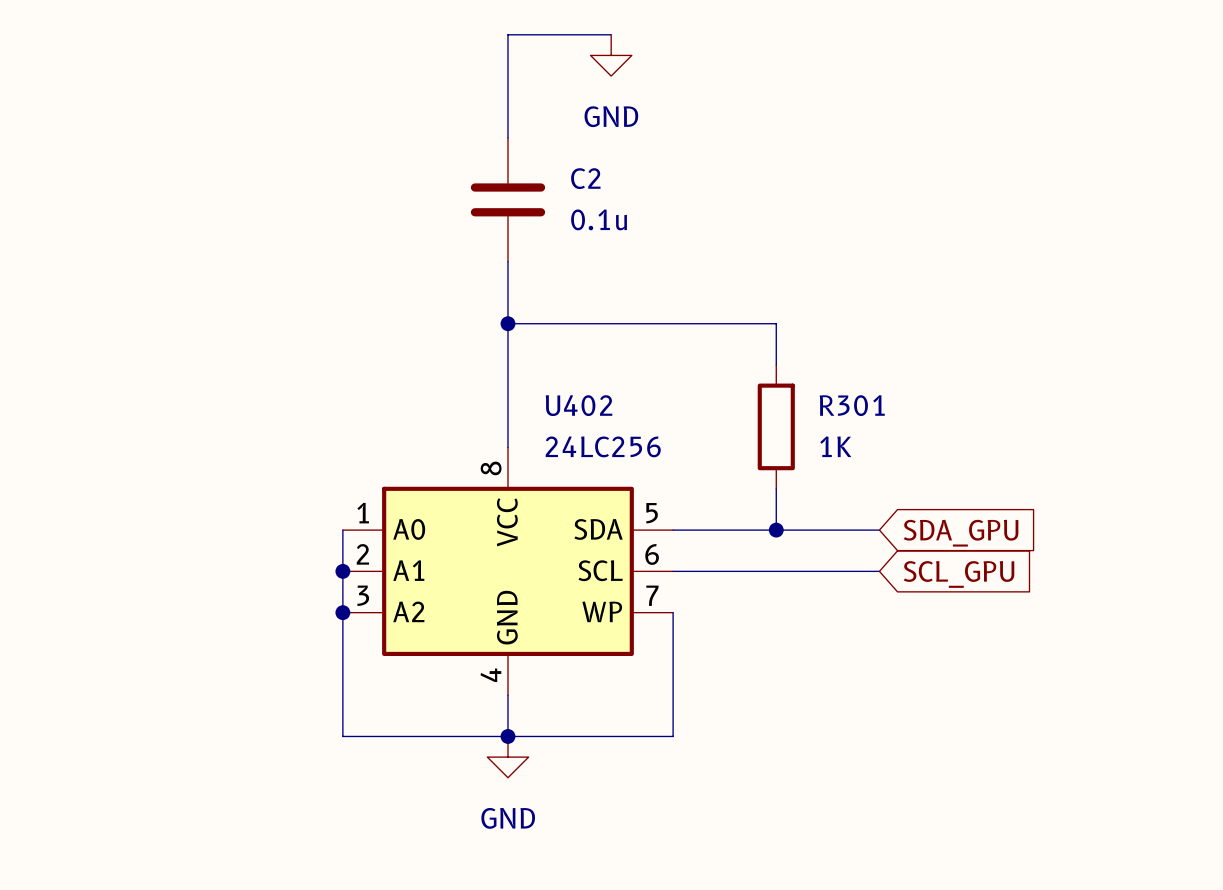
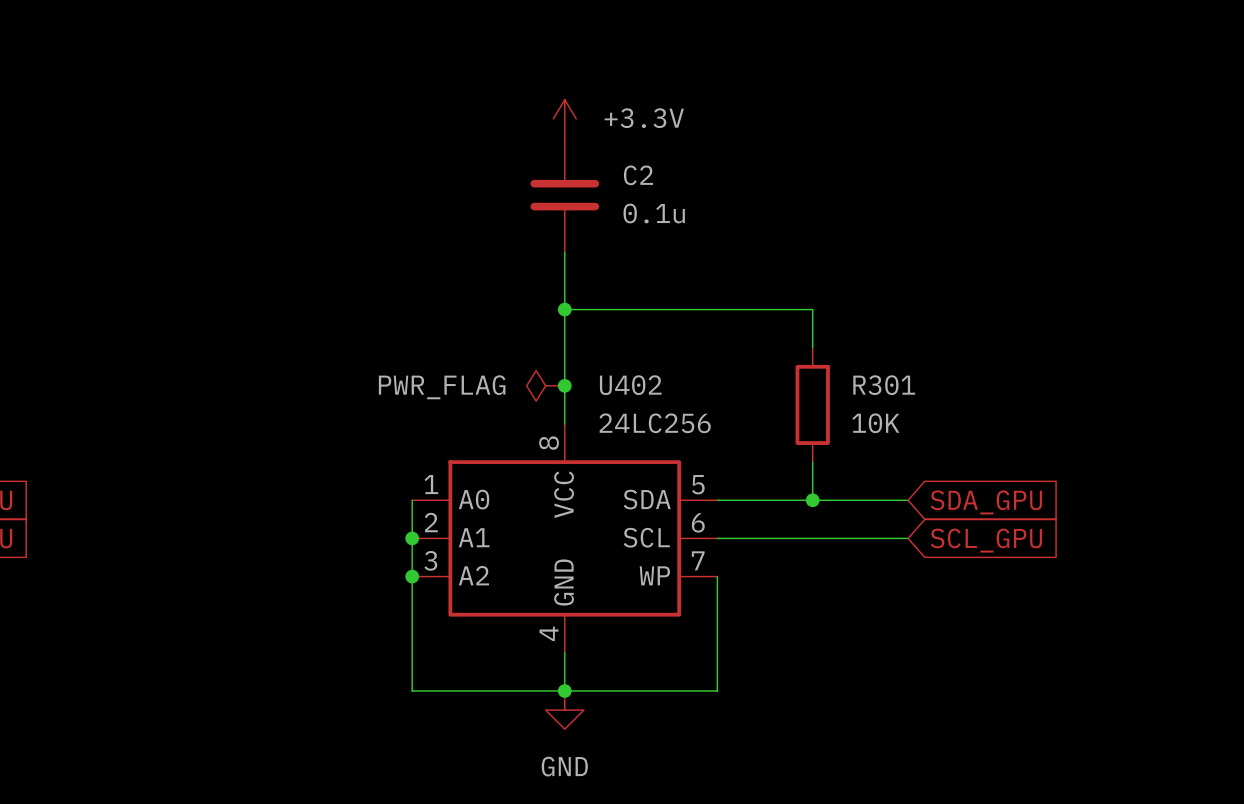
wire: (611, 34) (507, 34) (507, 137) -> none
power symbol: GND (611, 55) -> none
power symbol: none -> +3.3V (564, 118)
power symbol: none -> PWR_FLAG (545, 385)
junction: none -> (564, 385)
R301 value: 1K (835, 446) -> 10K (875, 423)

